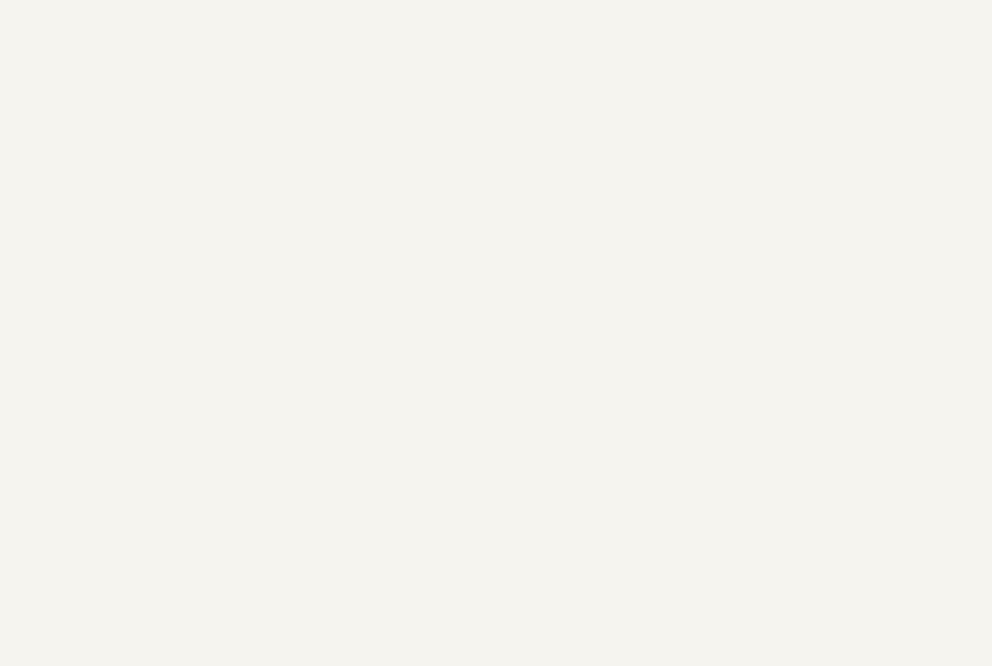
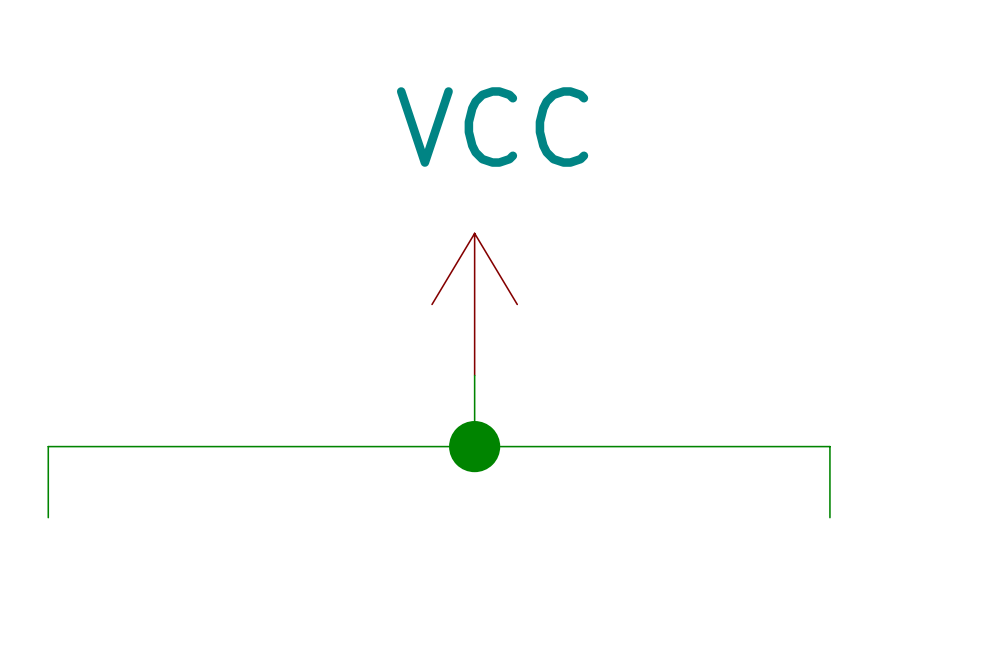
power symbol: none -> VCC (474, 304)
wire: none -> (474, 375) (474, 446)
junction: none -> (474, 446)
wire: none -> (48, 517) (48, 446) (829, 446) (829, 517)

